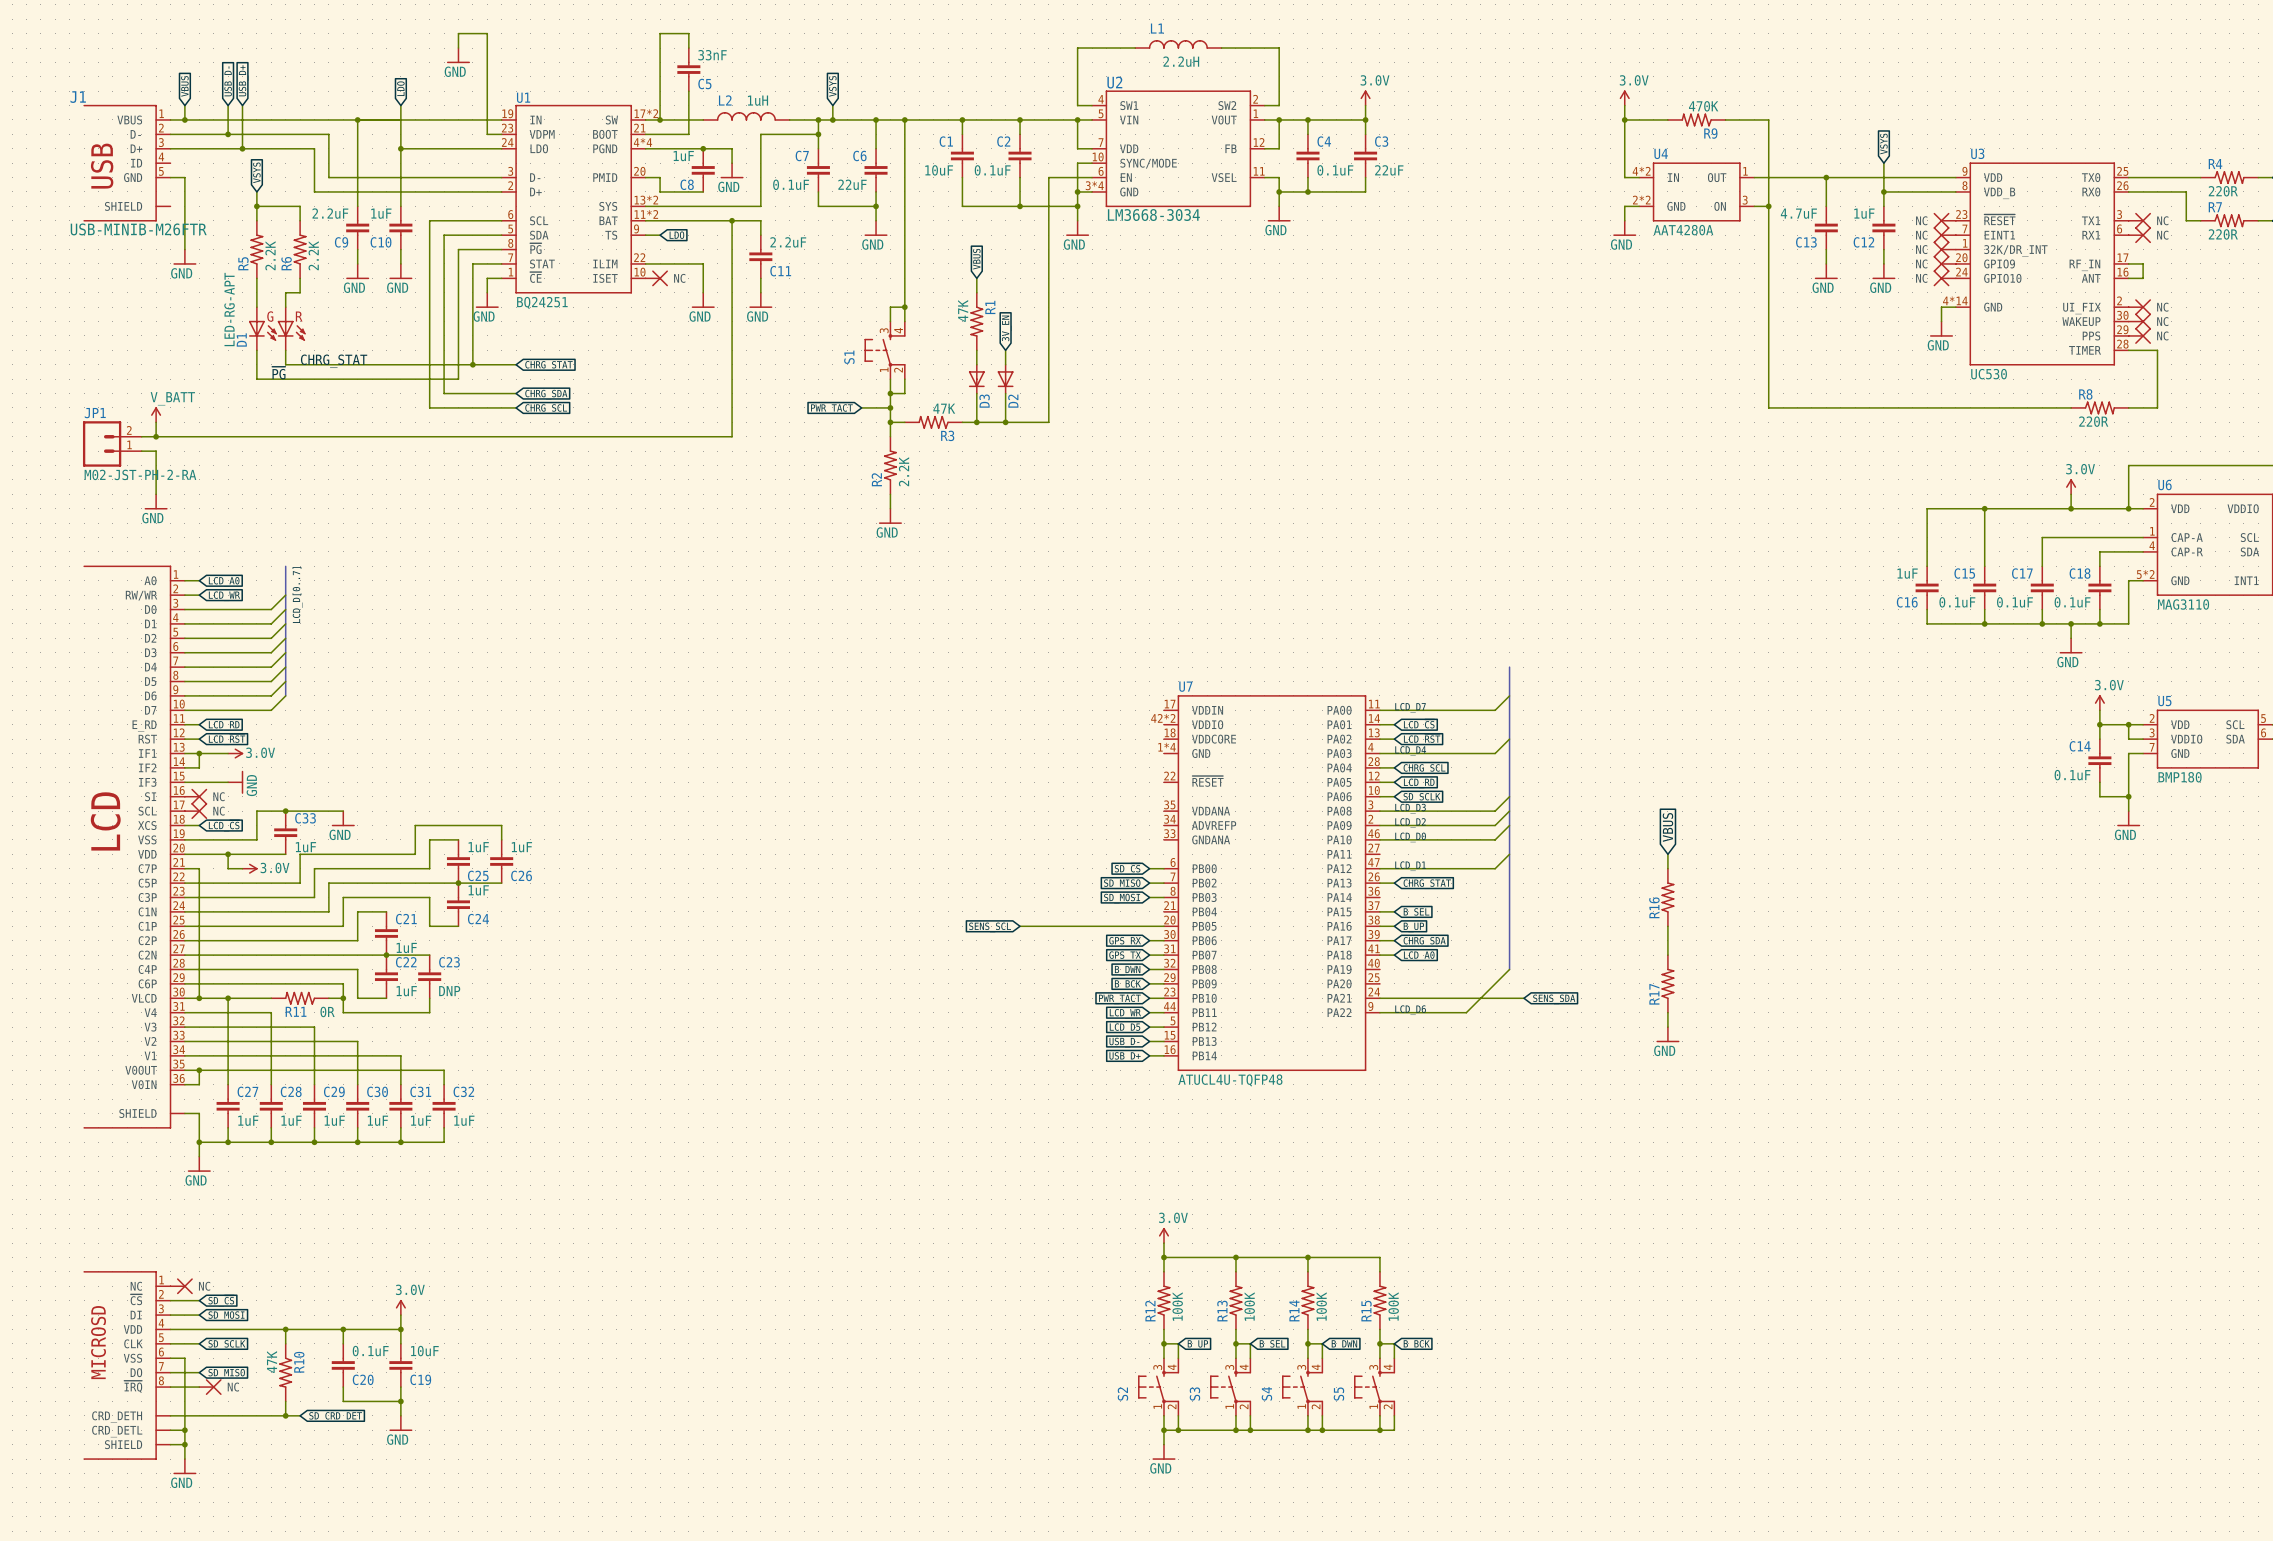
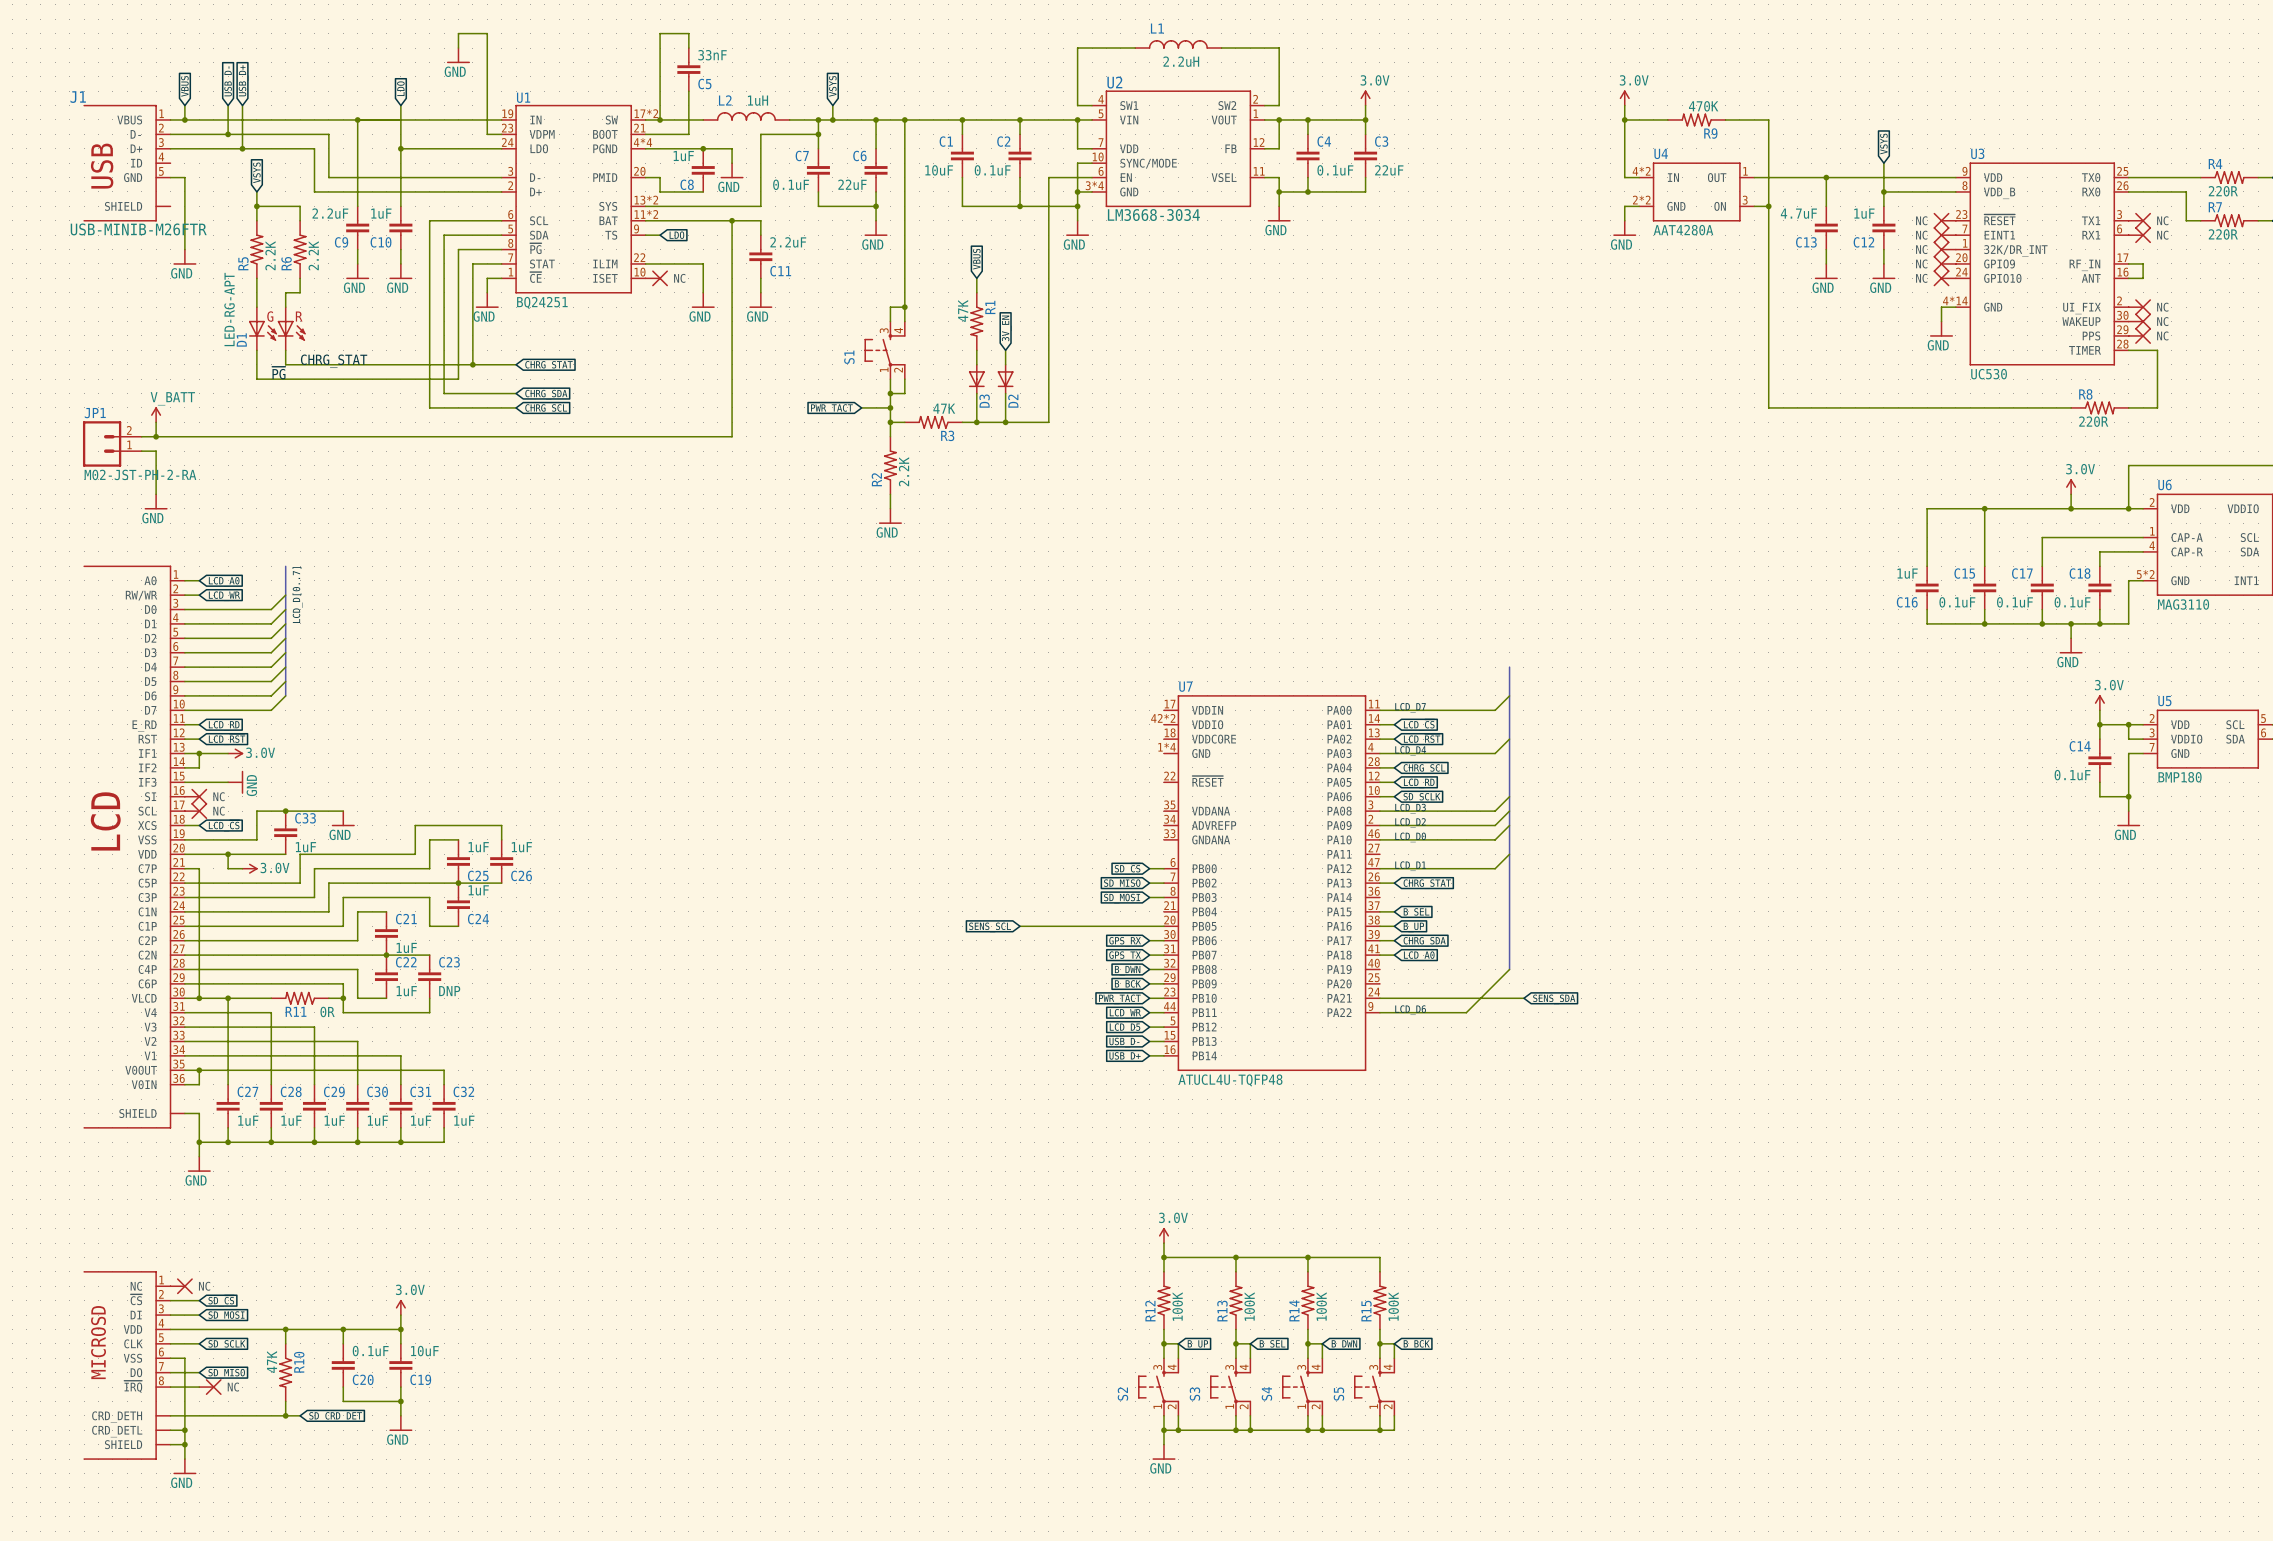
global label: VBUS (1667, 827) -> none
wire: (1667, 854) (1667, 868) -> none
R16: (1667, 897) -> none
wire: (1667, 926) (1667, 955) -> none
R17: (1667, 983) -> none
wire: (1667, 1012) (1667, 1027) -> none
power symbol: GND (1667, 1034) -> none

